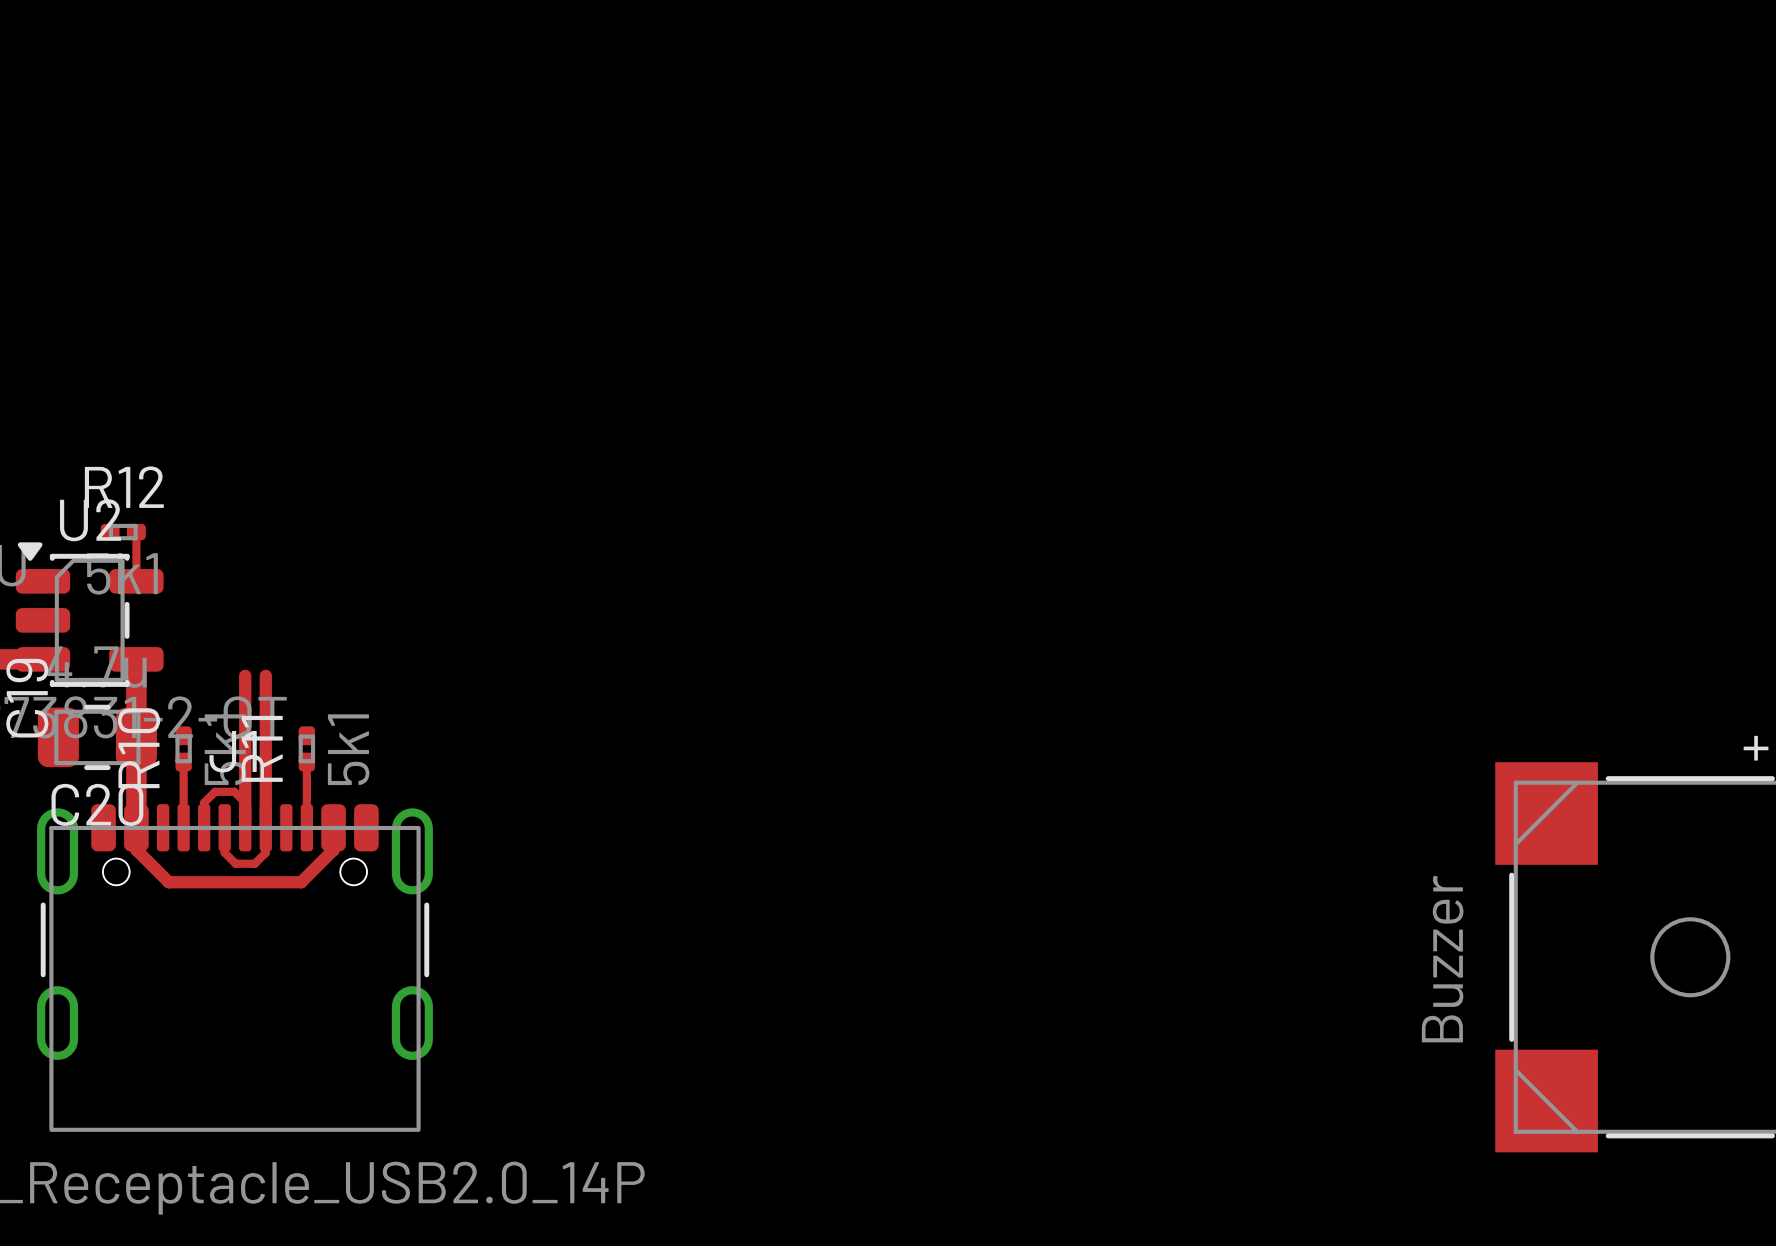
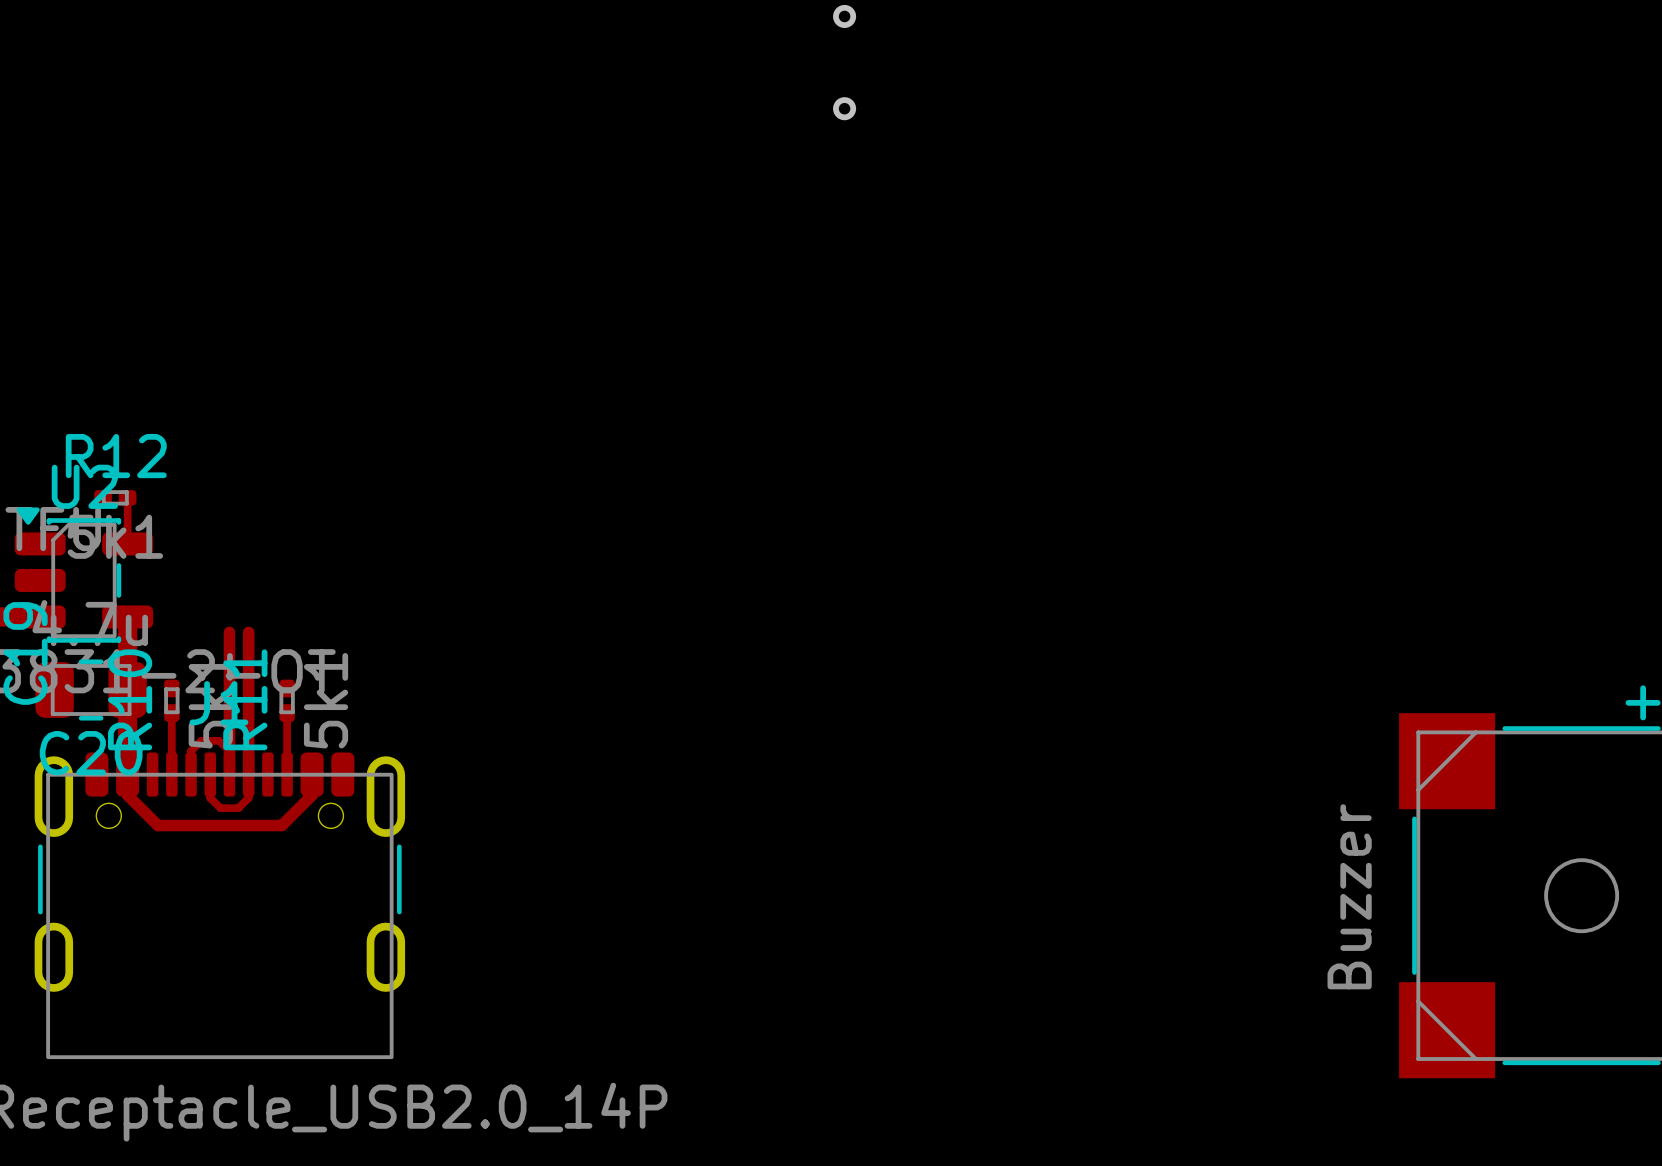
via: none -> (844, 16)
via: none -> (844, 108)

